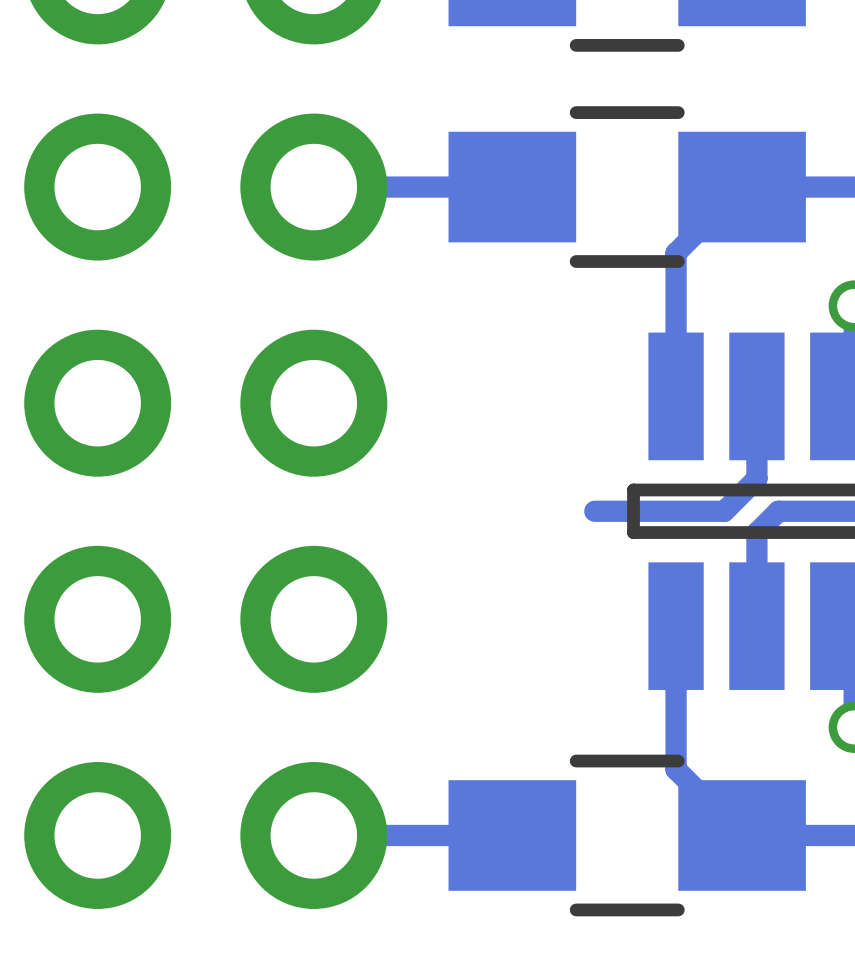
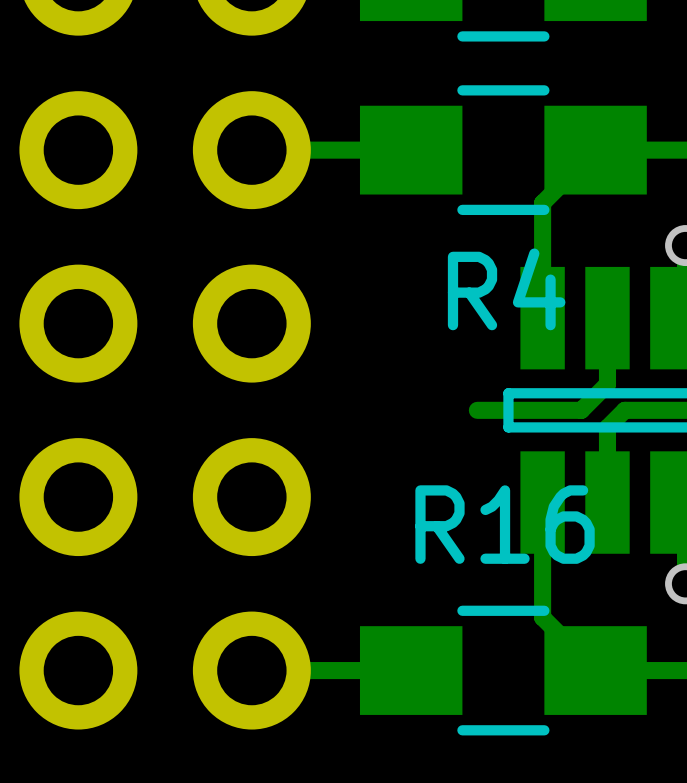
R4 name: none -> R4 (506, 289)
R16 name: none -> R16 (505, 524)

